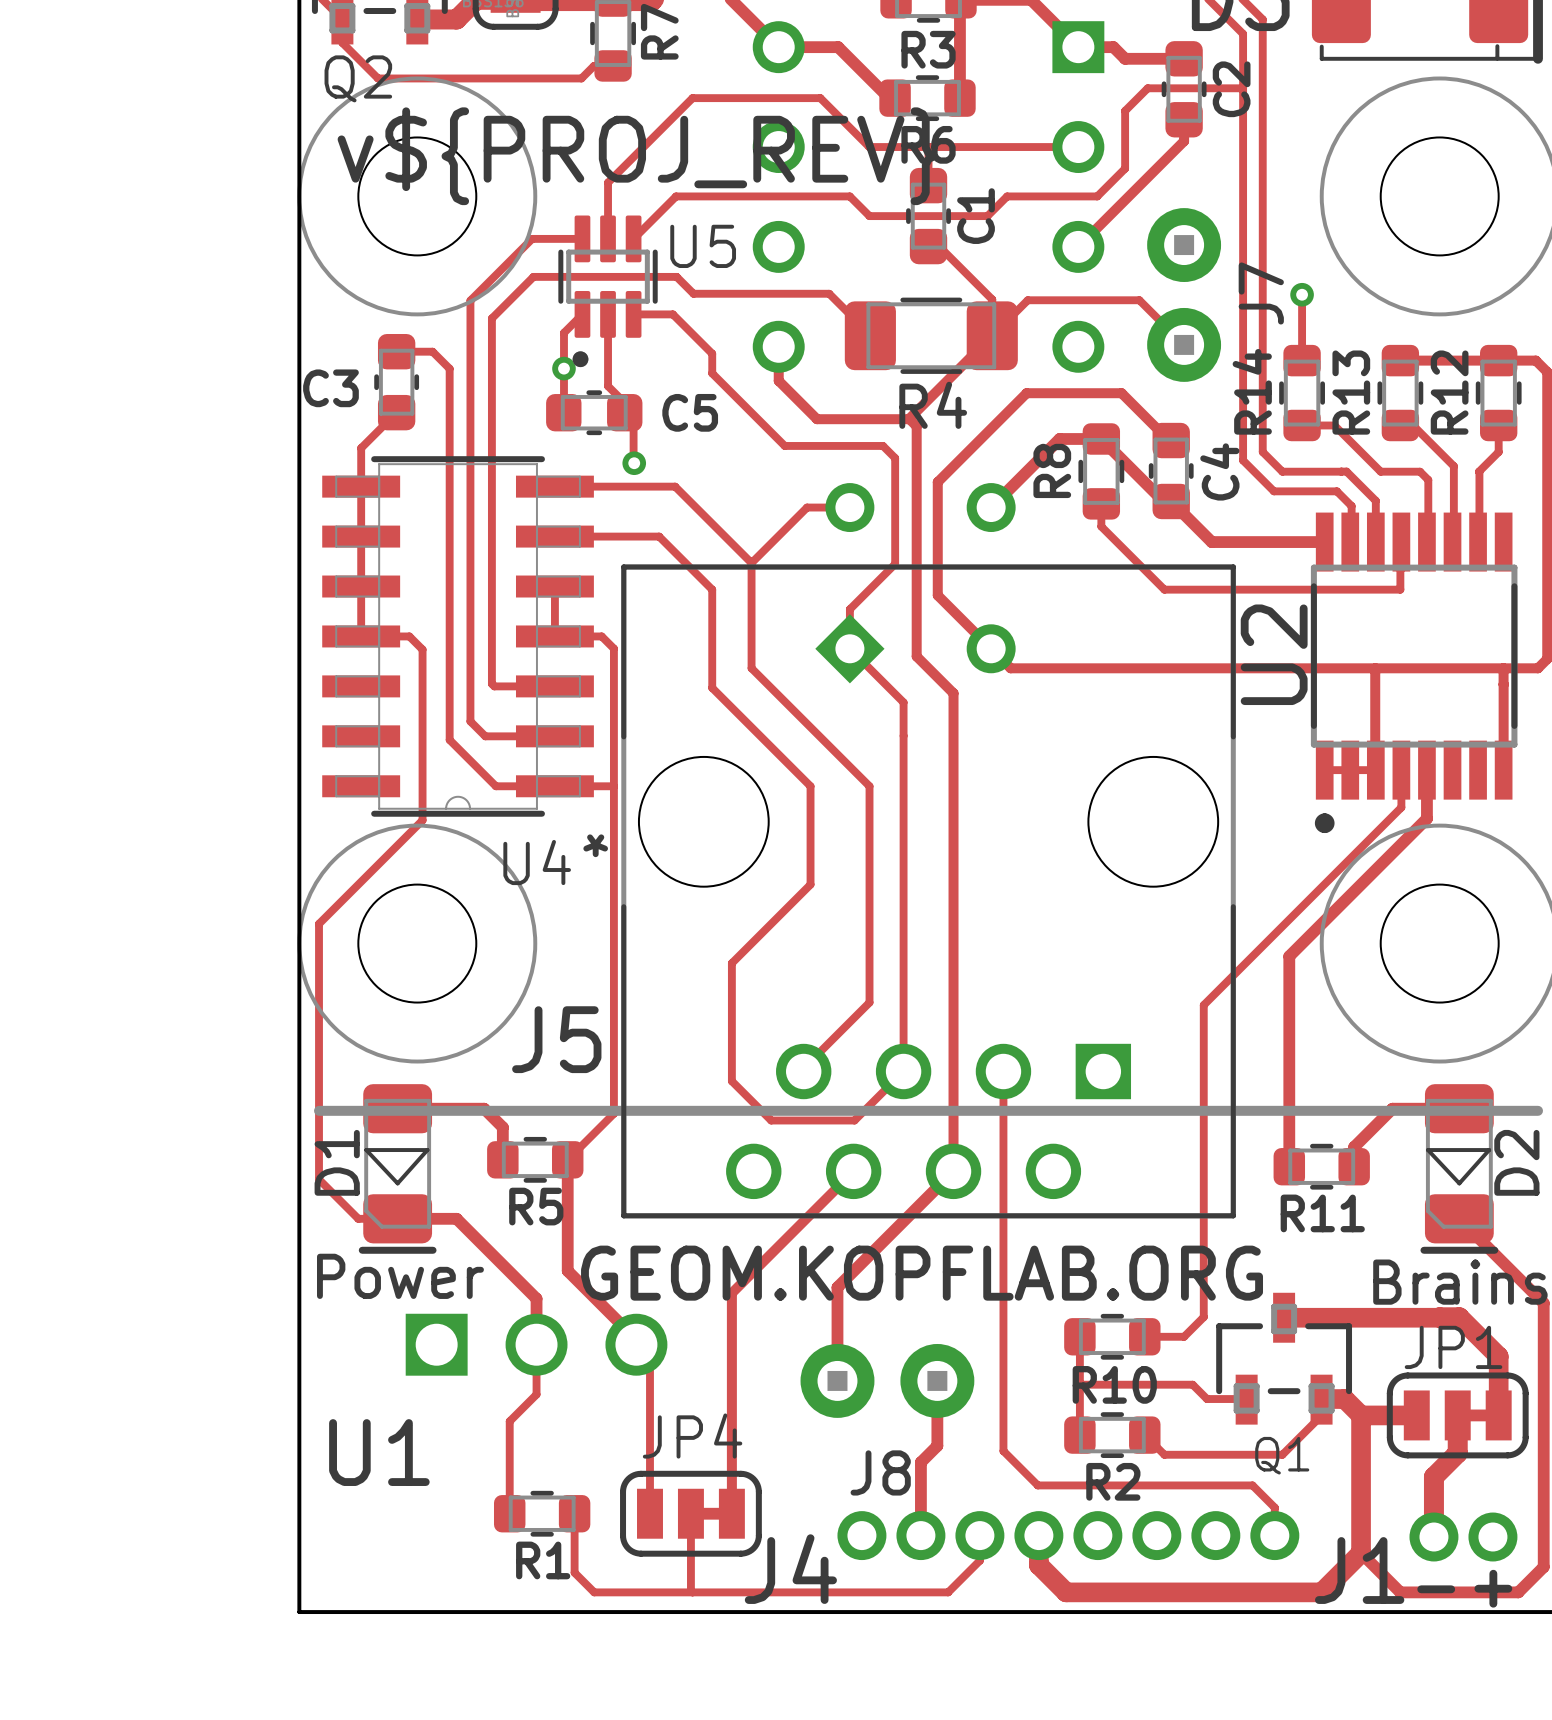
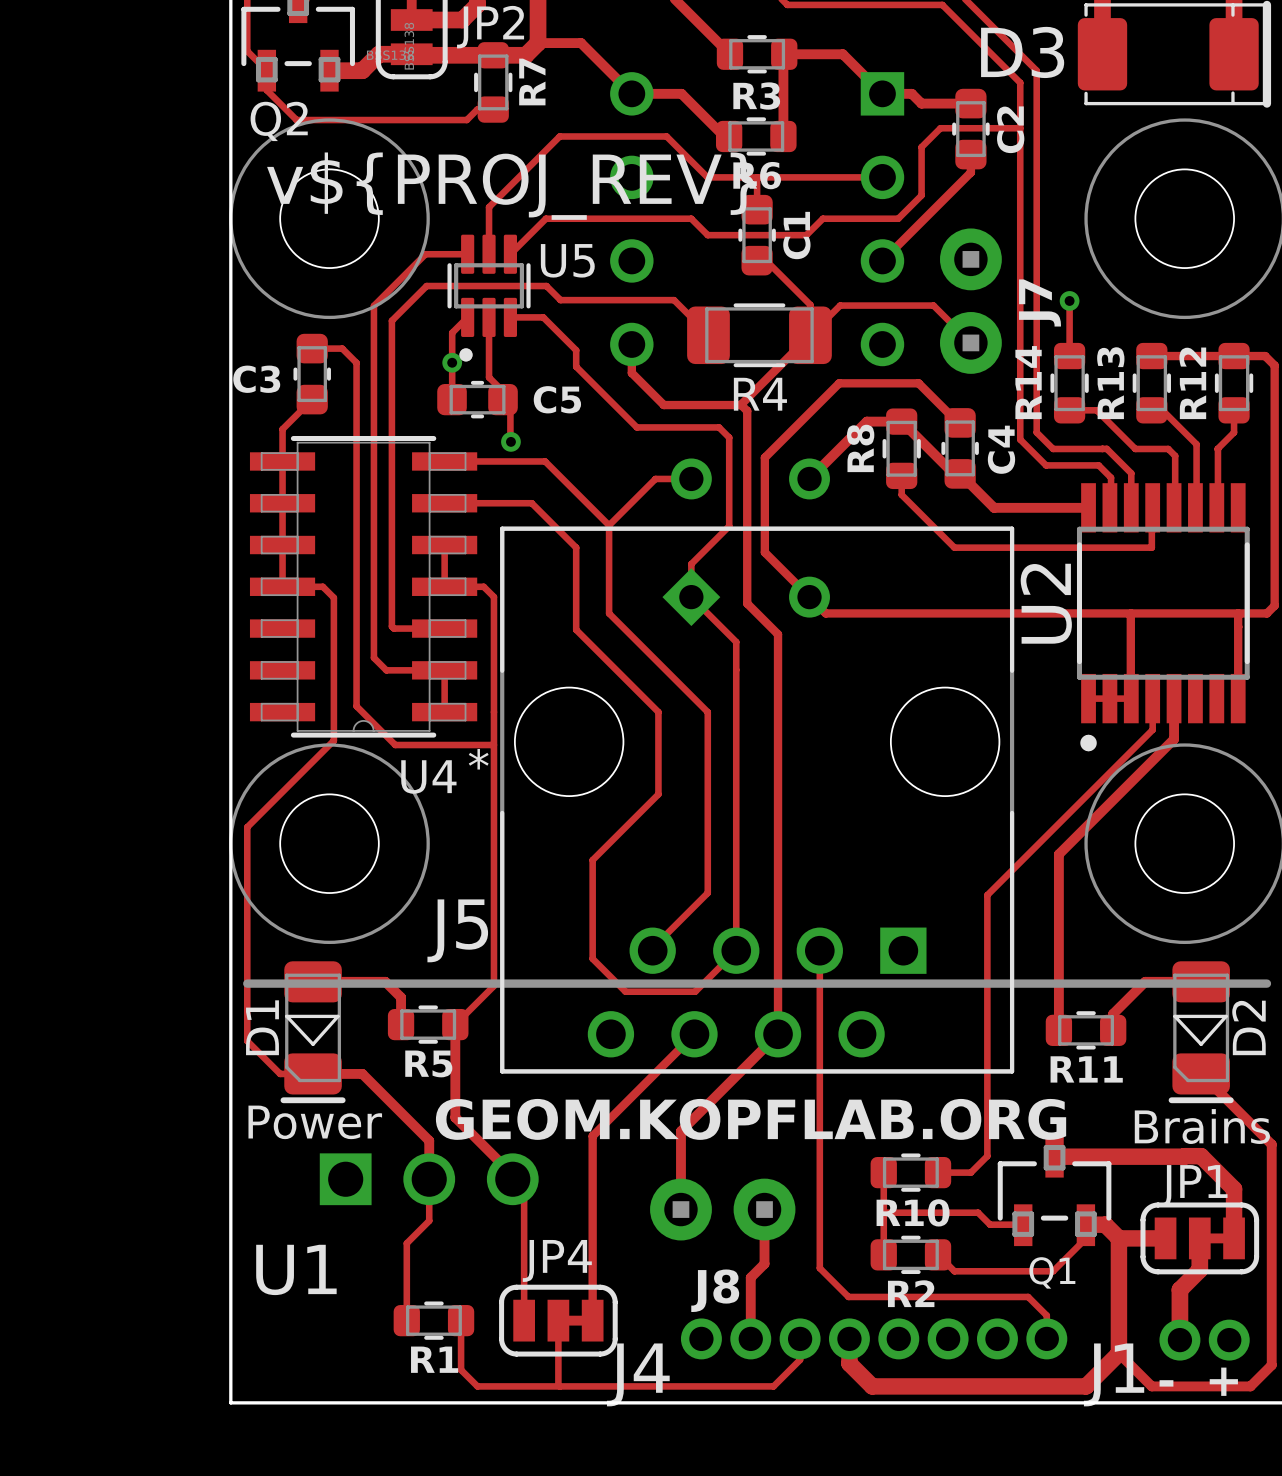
track: none -> (444, 670) (444, 712)
track: (449, 739) (495, 786) (613, 786) -> (356, 673) (356, 706) (395, 745) (493, 745)

